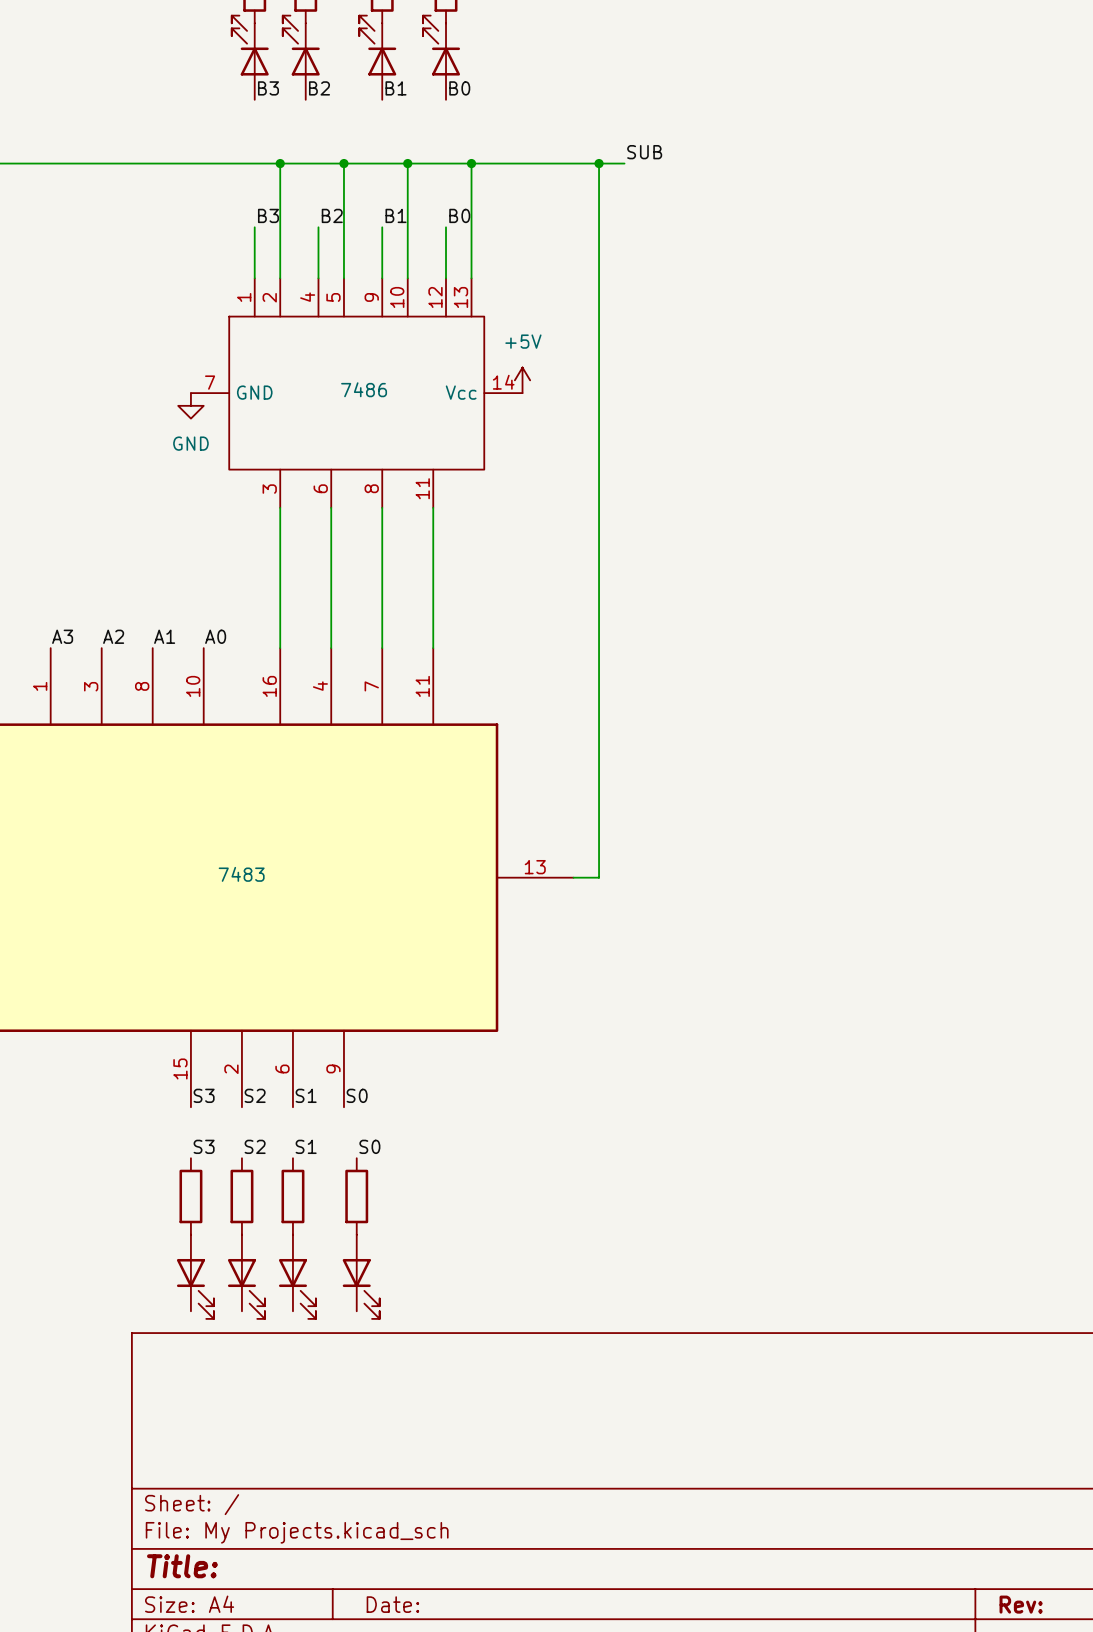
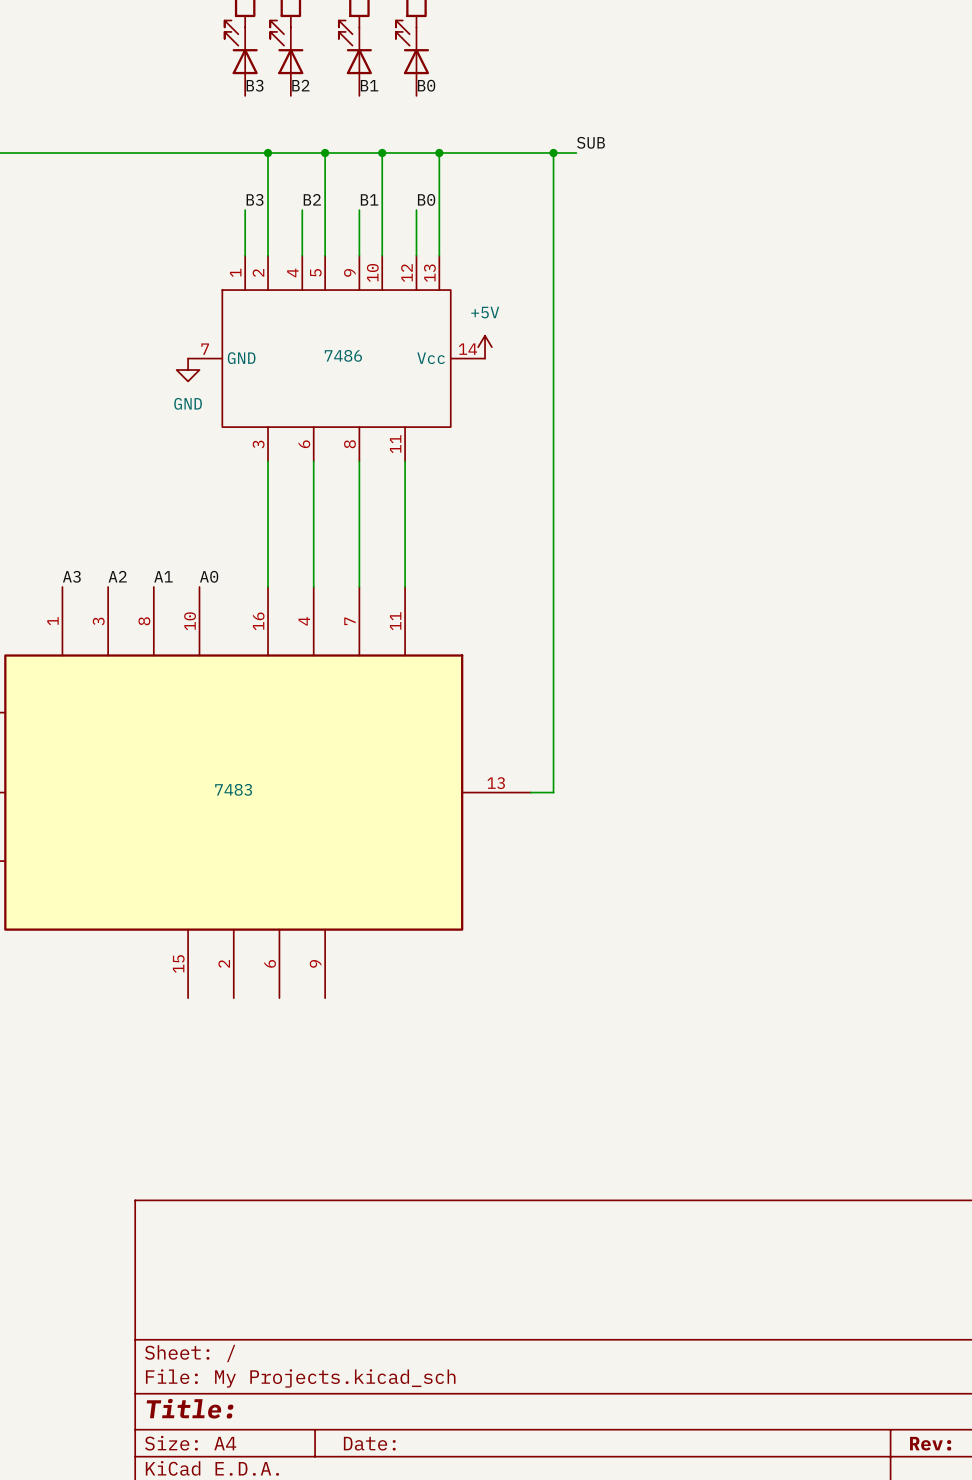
label: S3 (204, 1095) -> none
label: S2 (255, 1095) -> none
label: S1 (306, 1095) -> none
label: S0 (357, 1095) -> none
label: S3 (204, 1146) -> none
label: S2 (255, 1146) -> none
label: S1 (306, 1146) -> none
label: S0 (369, 1146) -> none
part: (190, 1196) -> none
part: (241, 1196) -> none
part: (292, 1196) -> none
part: (356, 1196) -> none
part: (195, 1276) -> none
part: (246, 1276) -> none
part: (297, 1276) -> none
part: (361, 1276) -> none

